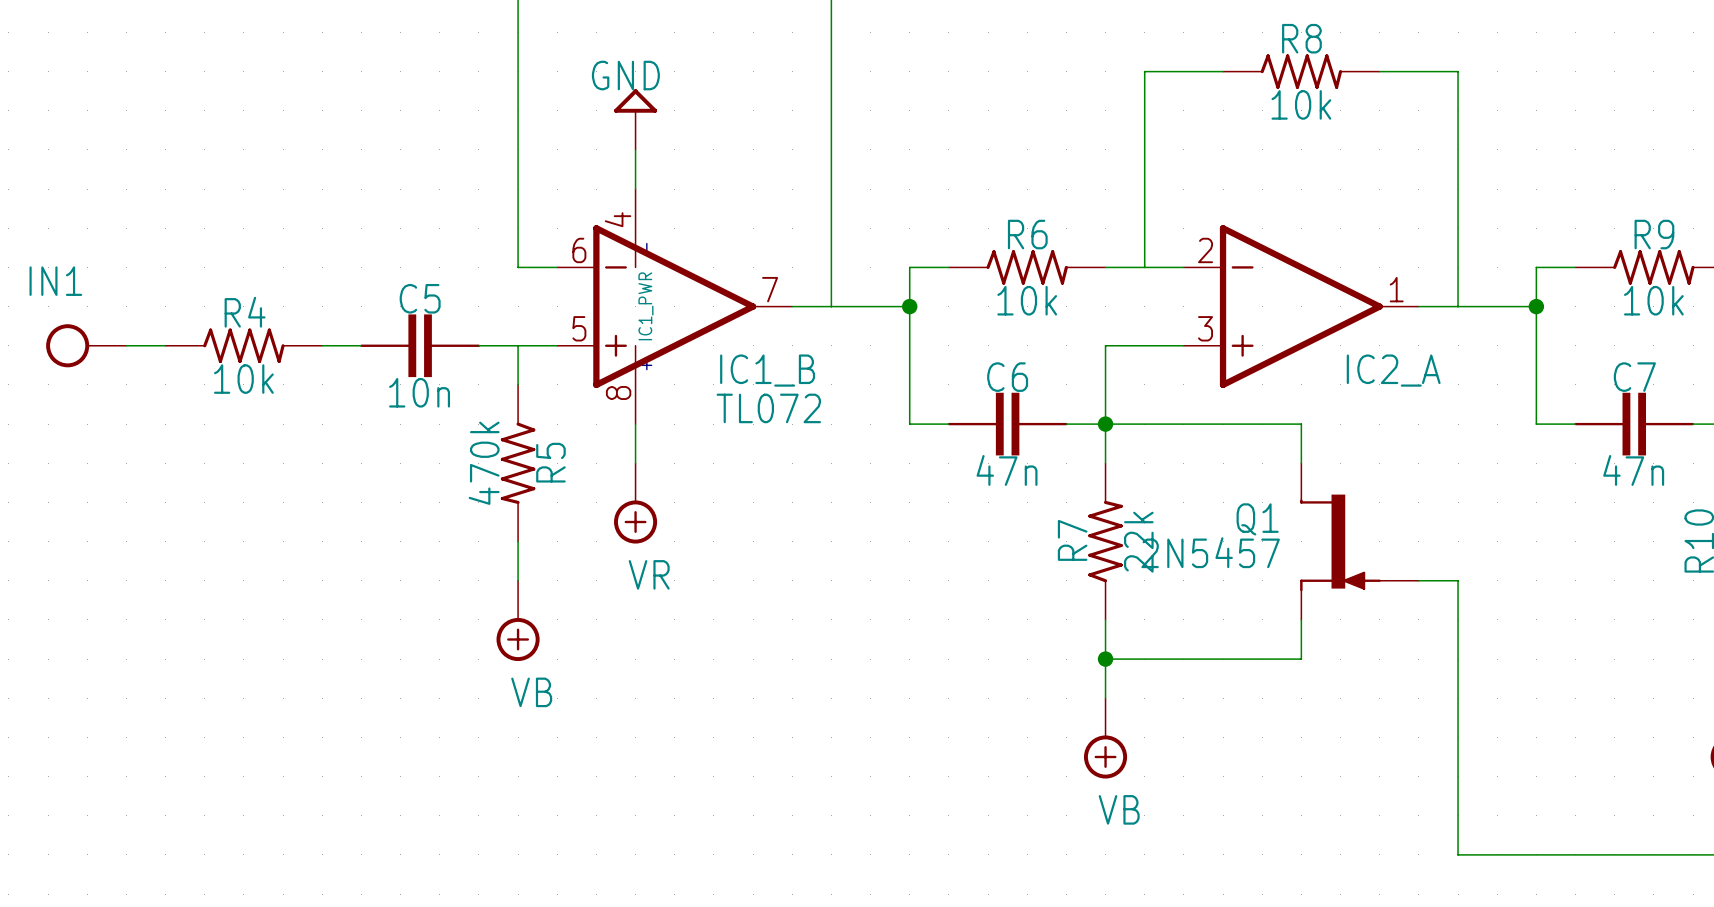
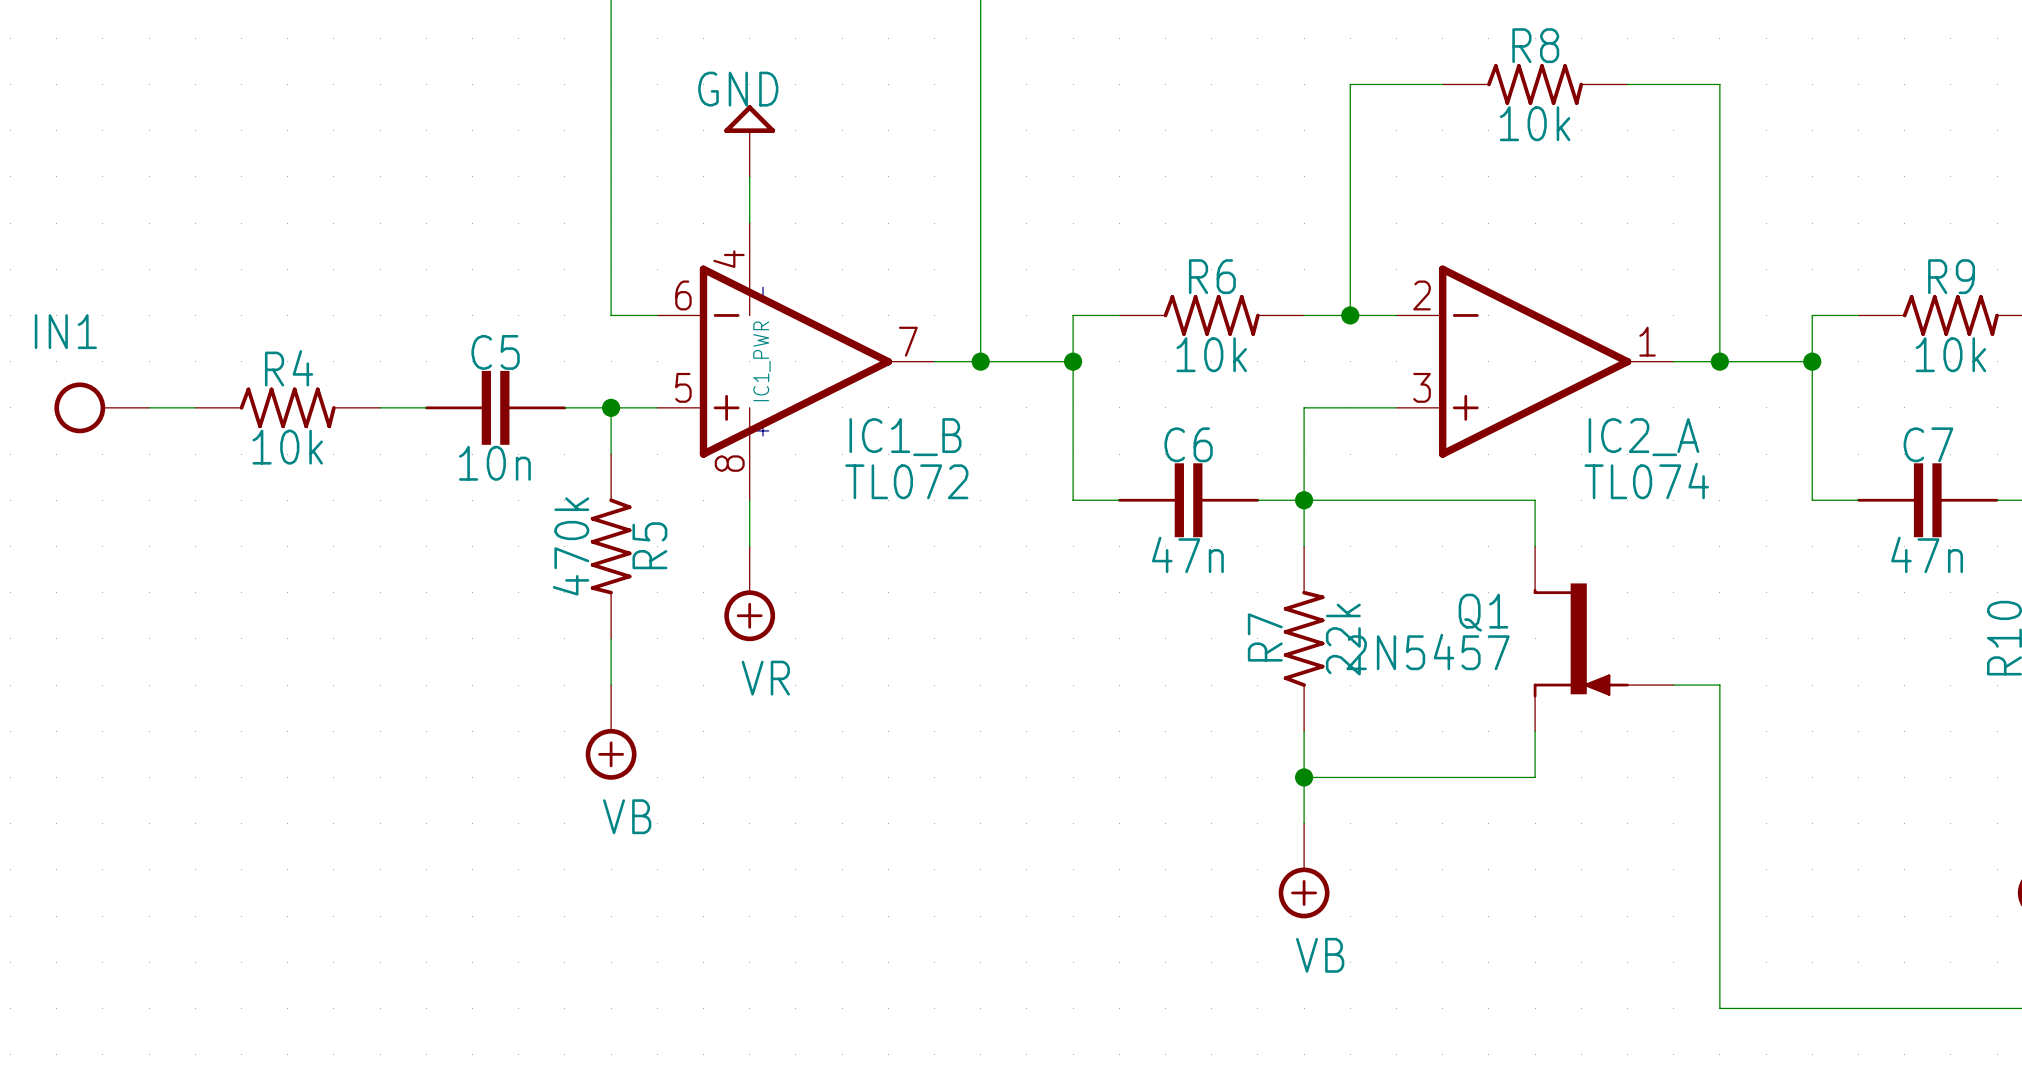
junction: none -> (1350, 315)
junction: none -> (980, 361)
junction: none -> (1719, 361)
junction: none -> (611, 407)
IC2_A value: none -> TL074 (1646, 481)

